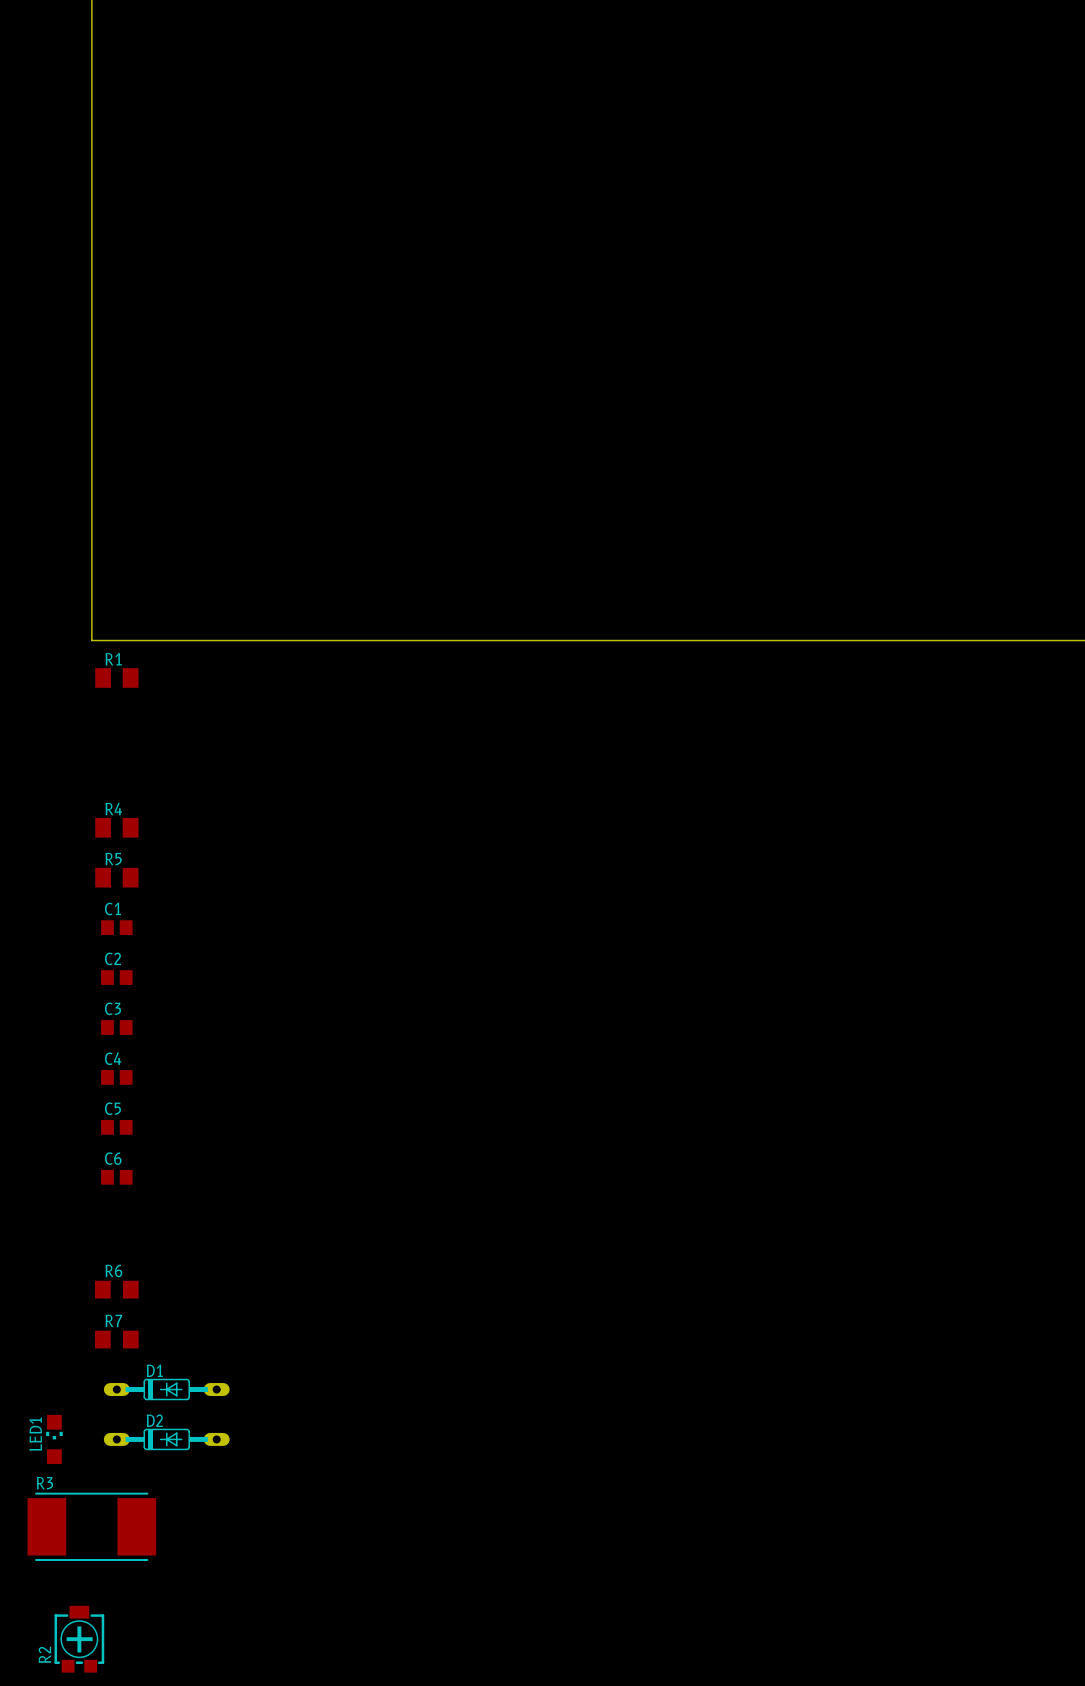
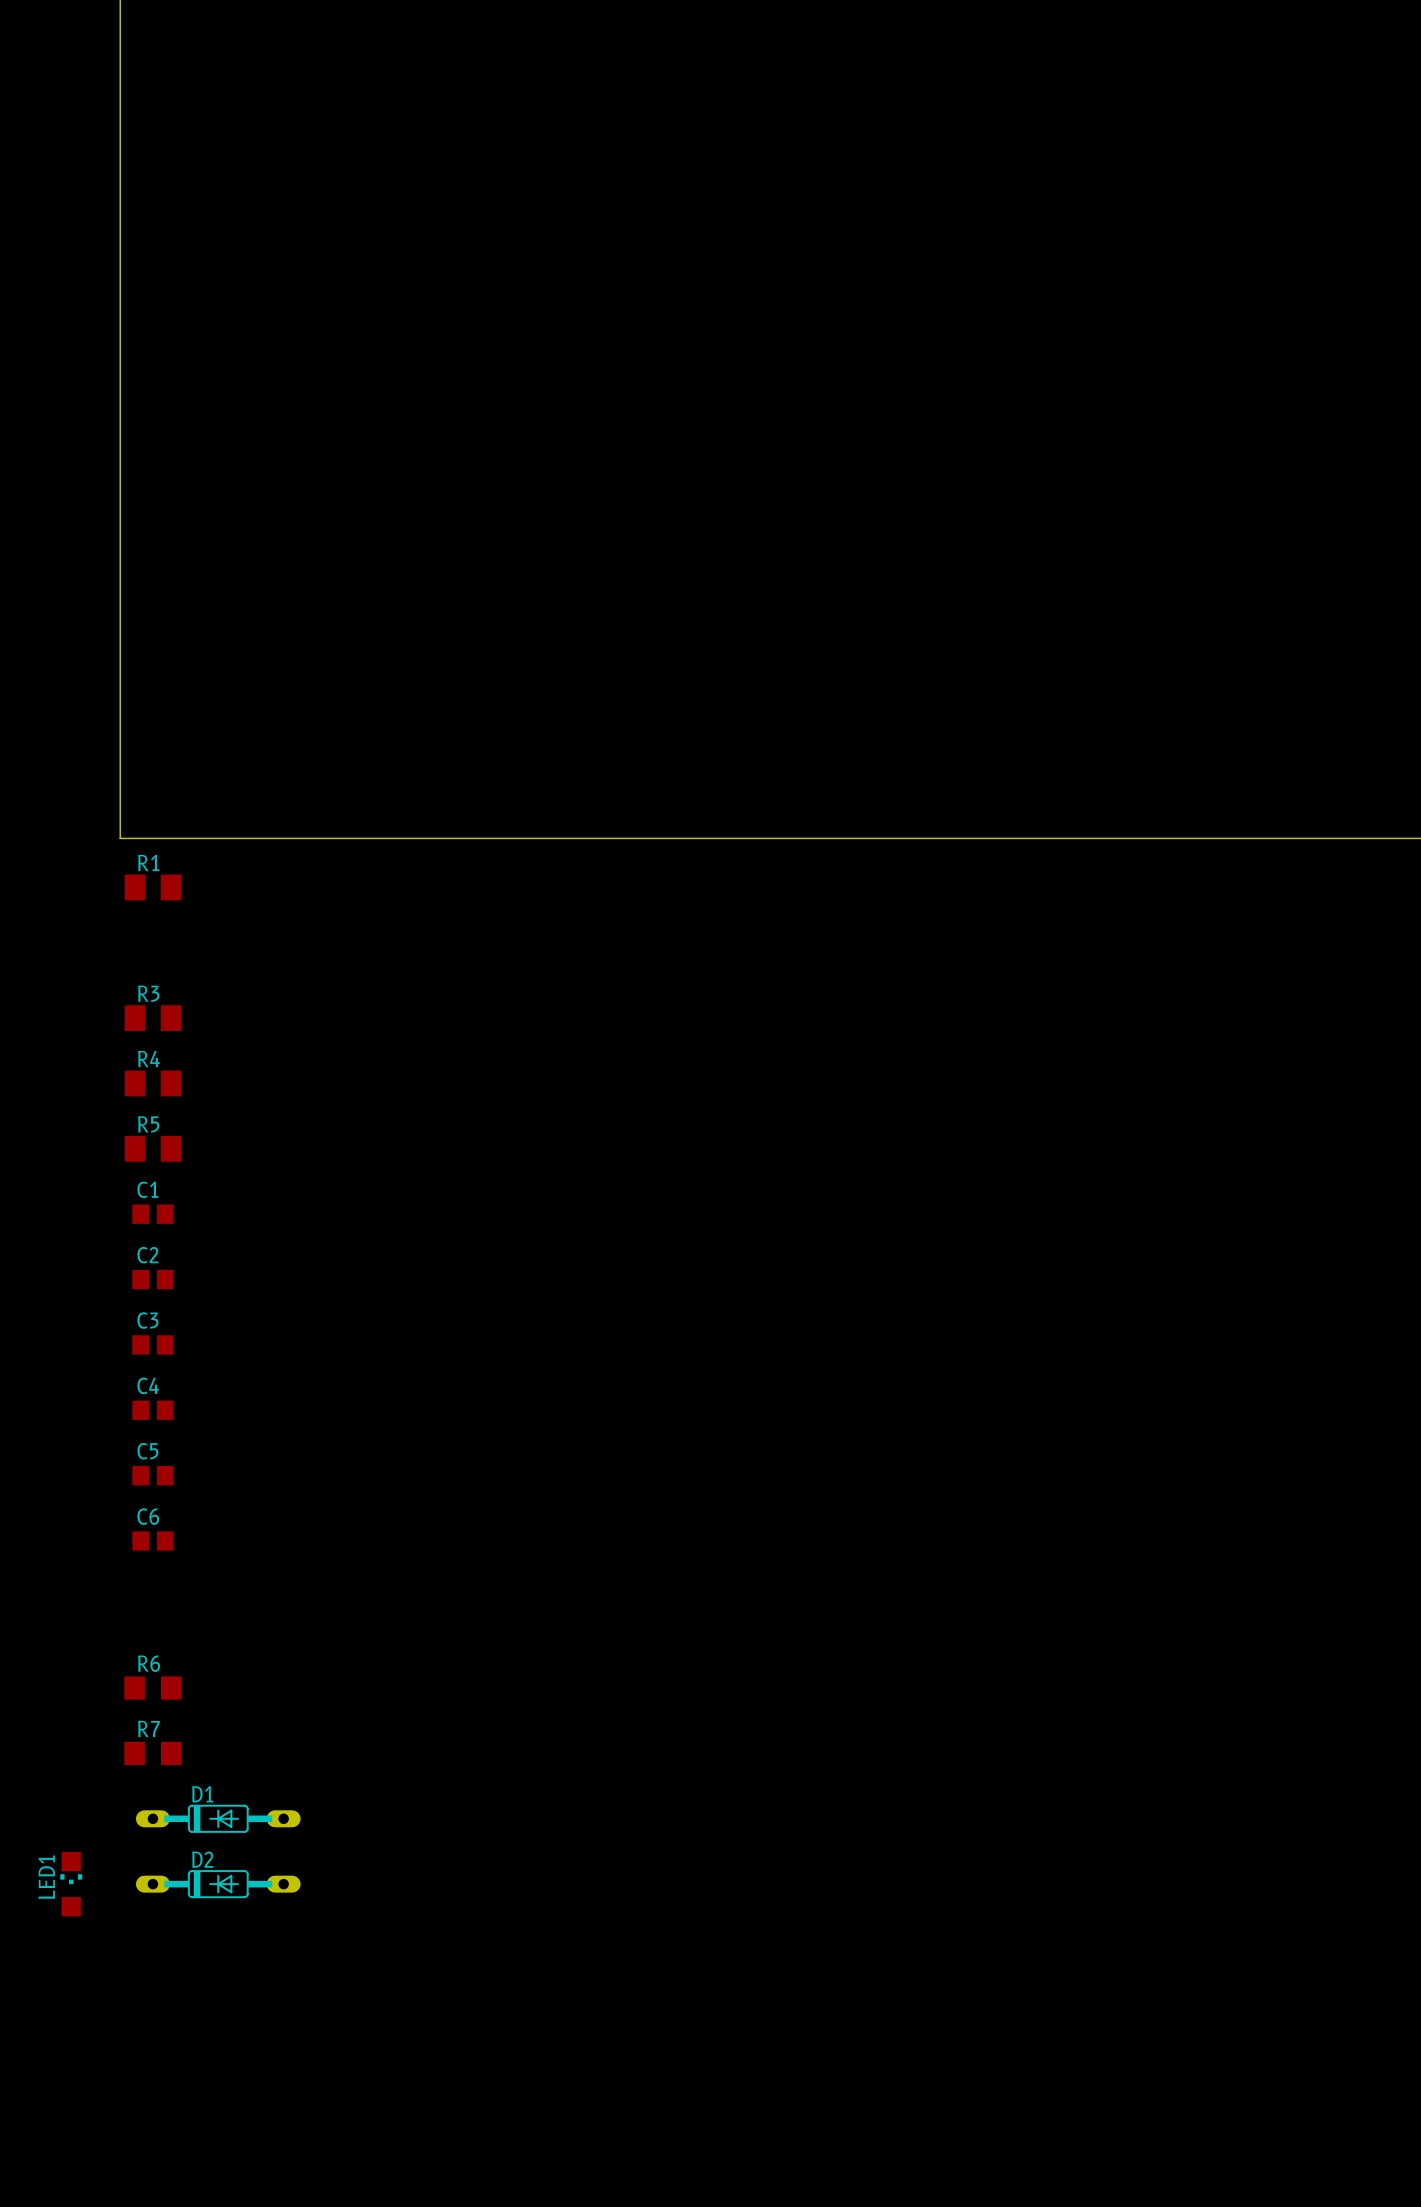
R3 name position: R3 (44, 1483) -> R3 (148, 993)
R3 footprint: [27, 1492, 157, 1562] -> [124, 1005, 182, 1032]
R2: (79, 1639) -> none

